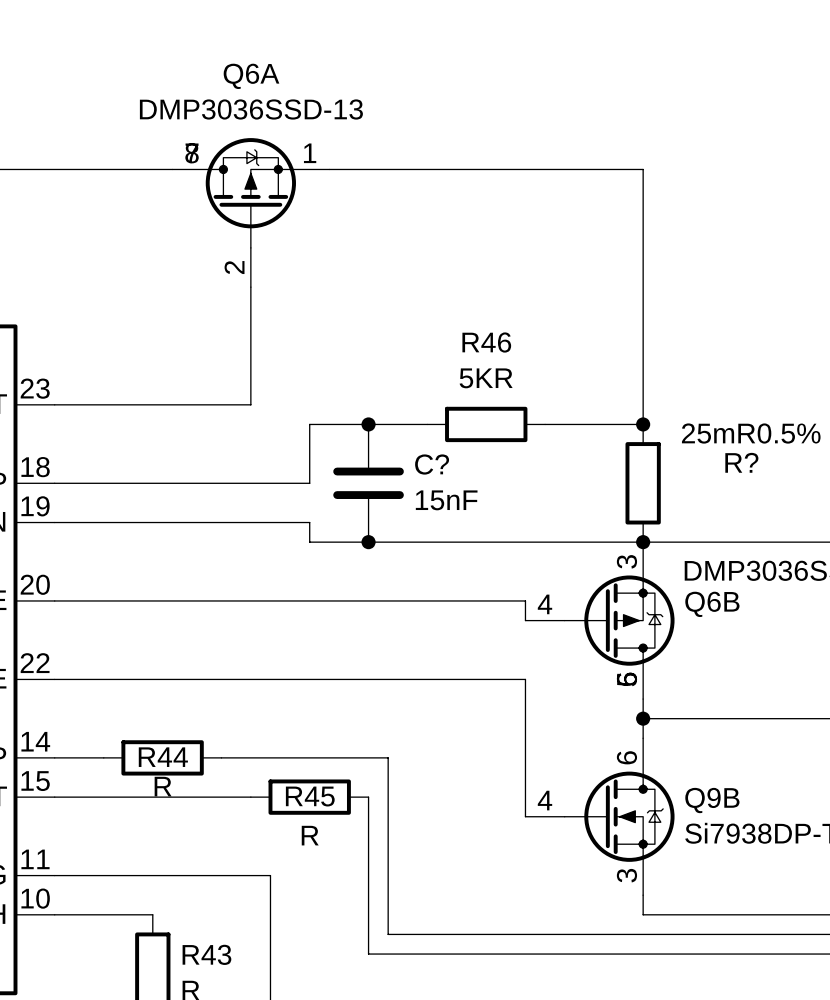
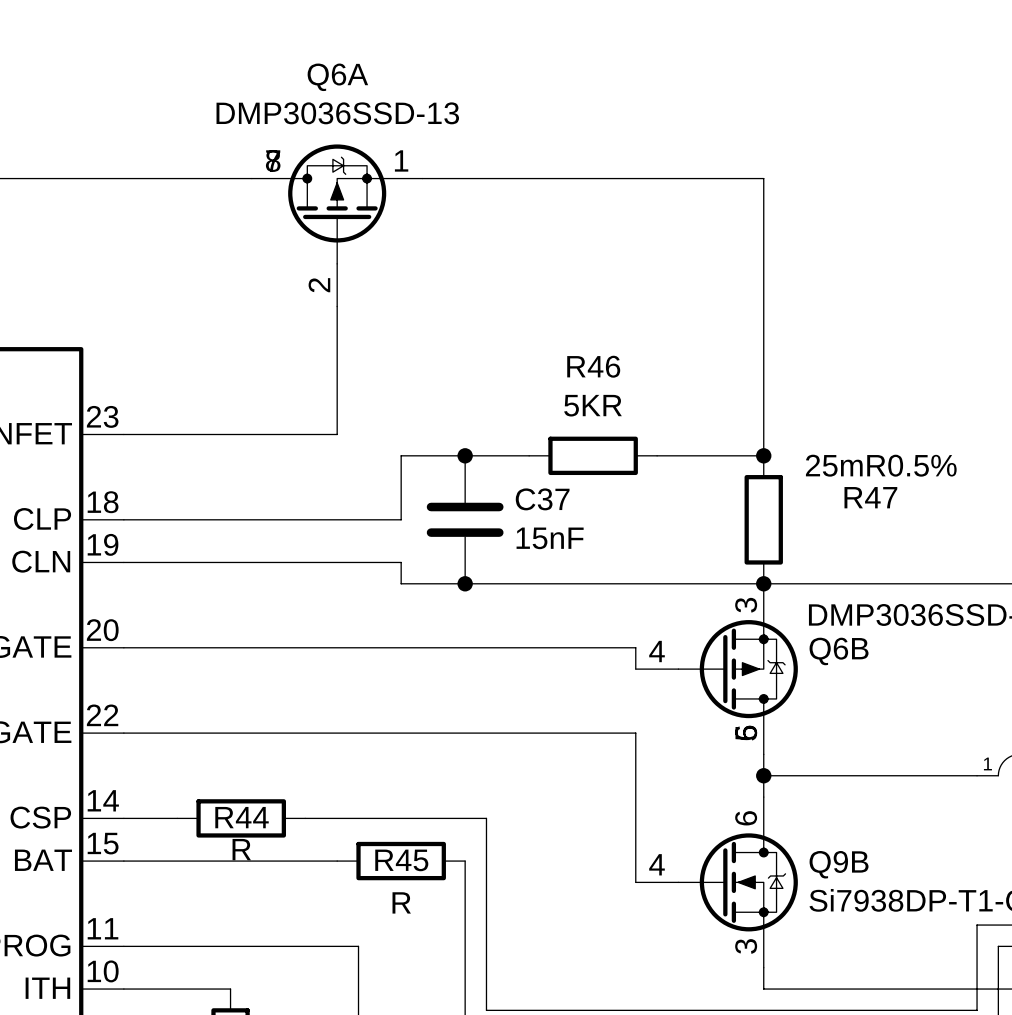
R? name: R? (741, 462) -> R47 (870, 497)
C? name: C? (432, 464) -> C37 (542, 499)

